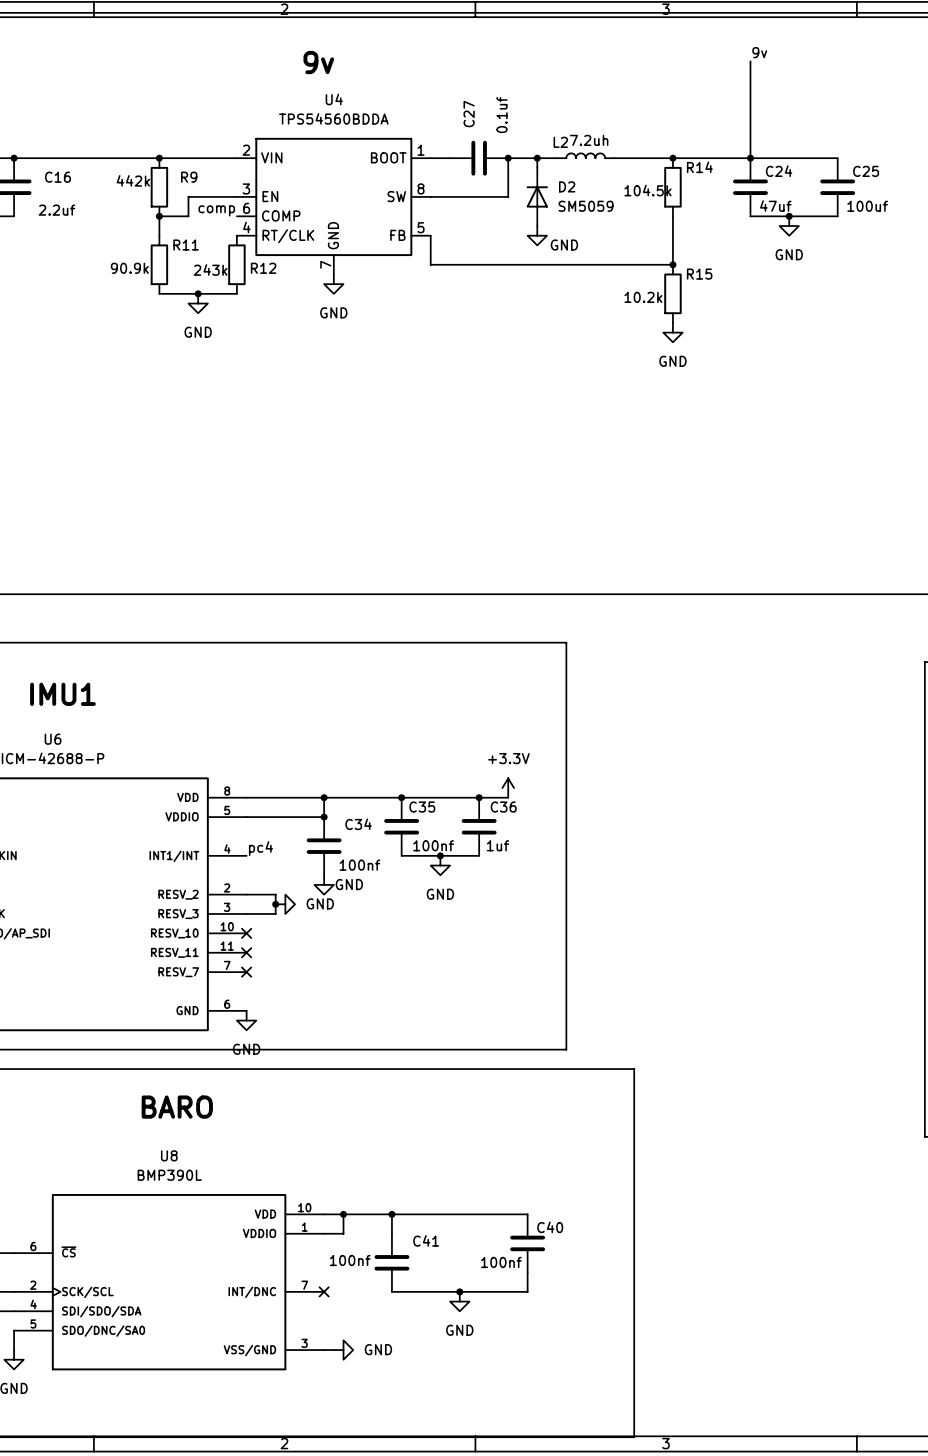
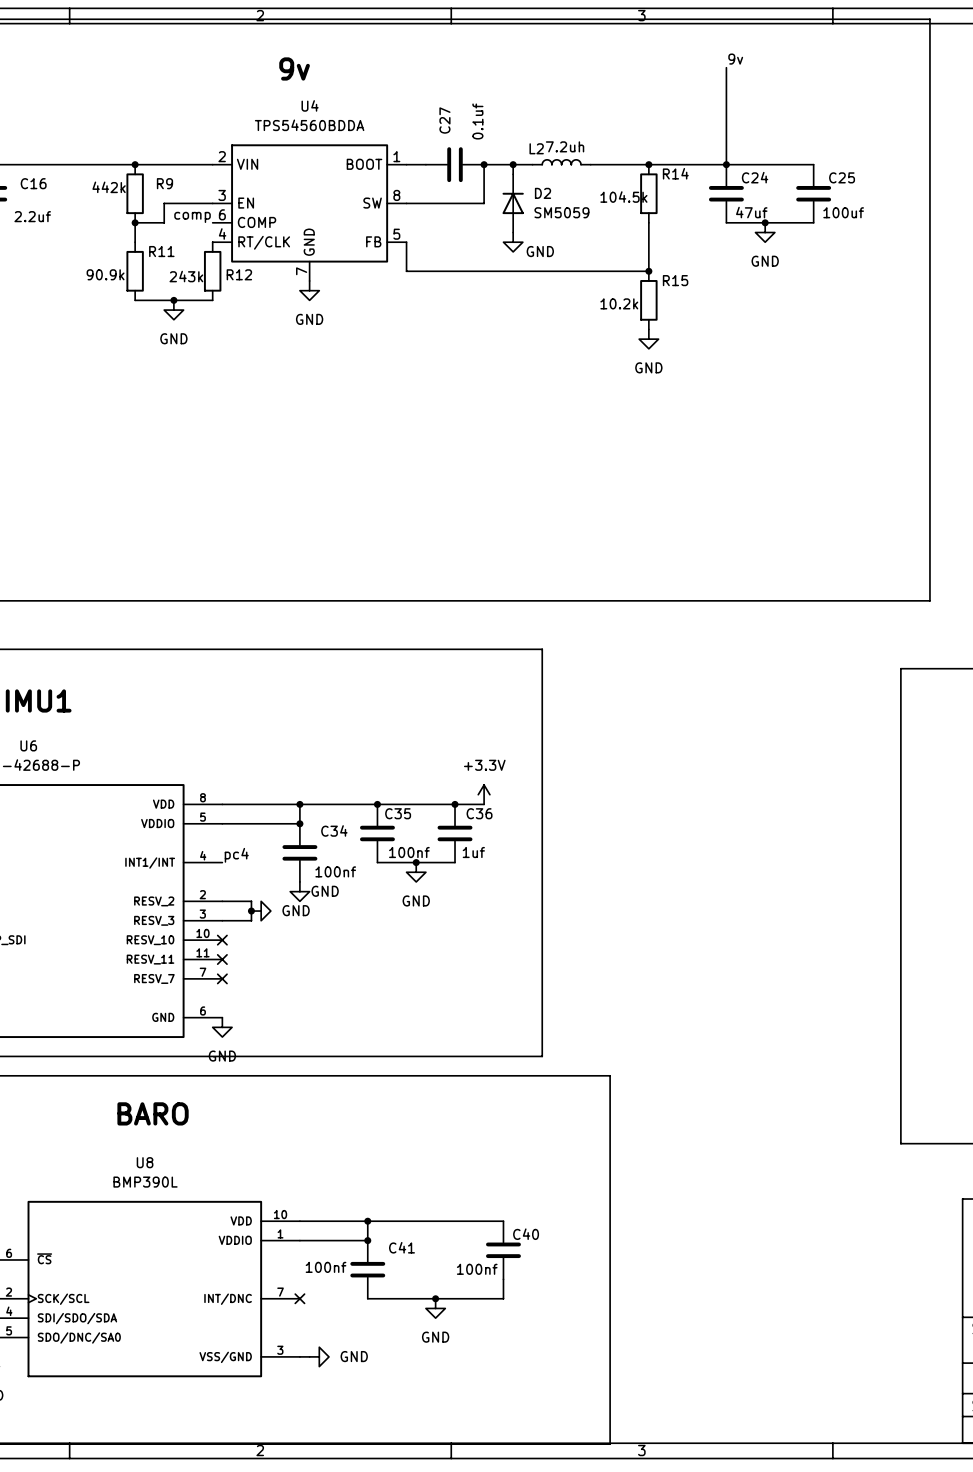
wire: (343, 1214) (343, 1233) -> (367, 1240) (319, 1240)
junction: (343, 1214) -> none
junction: none -> (367, 1240)

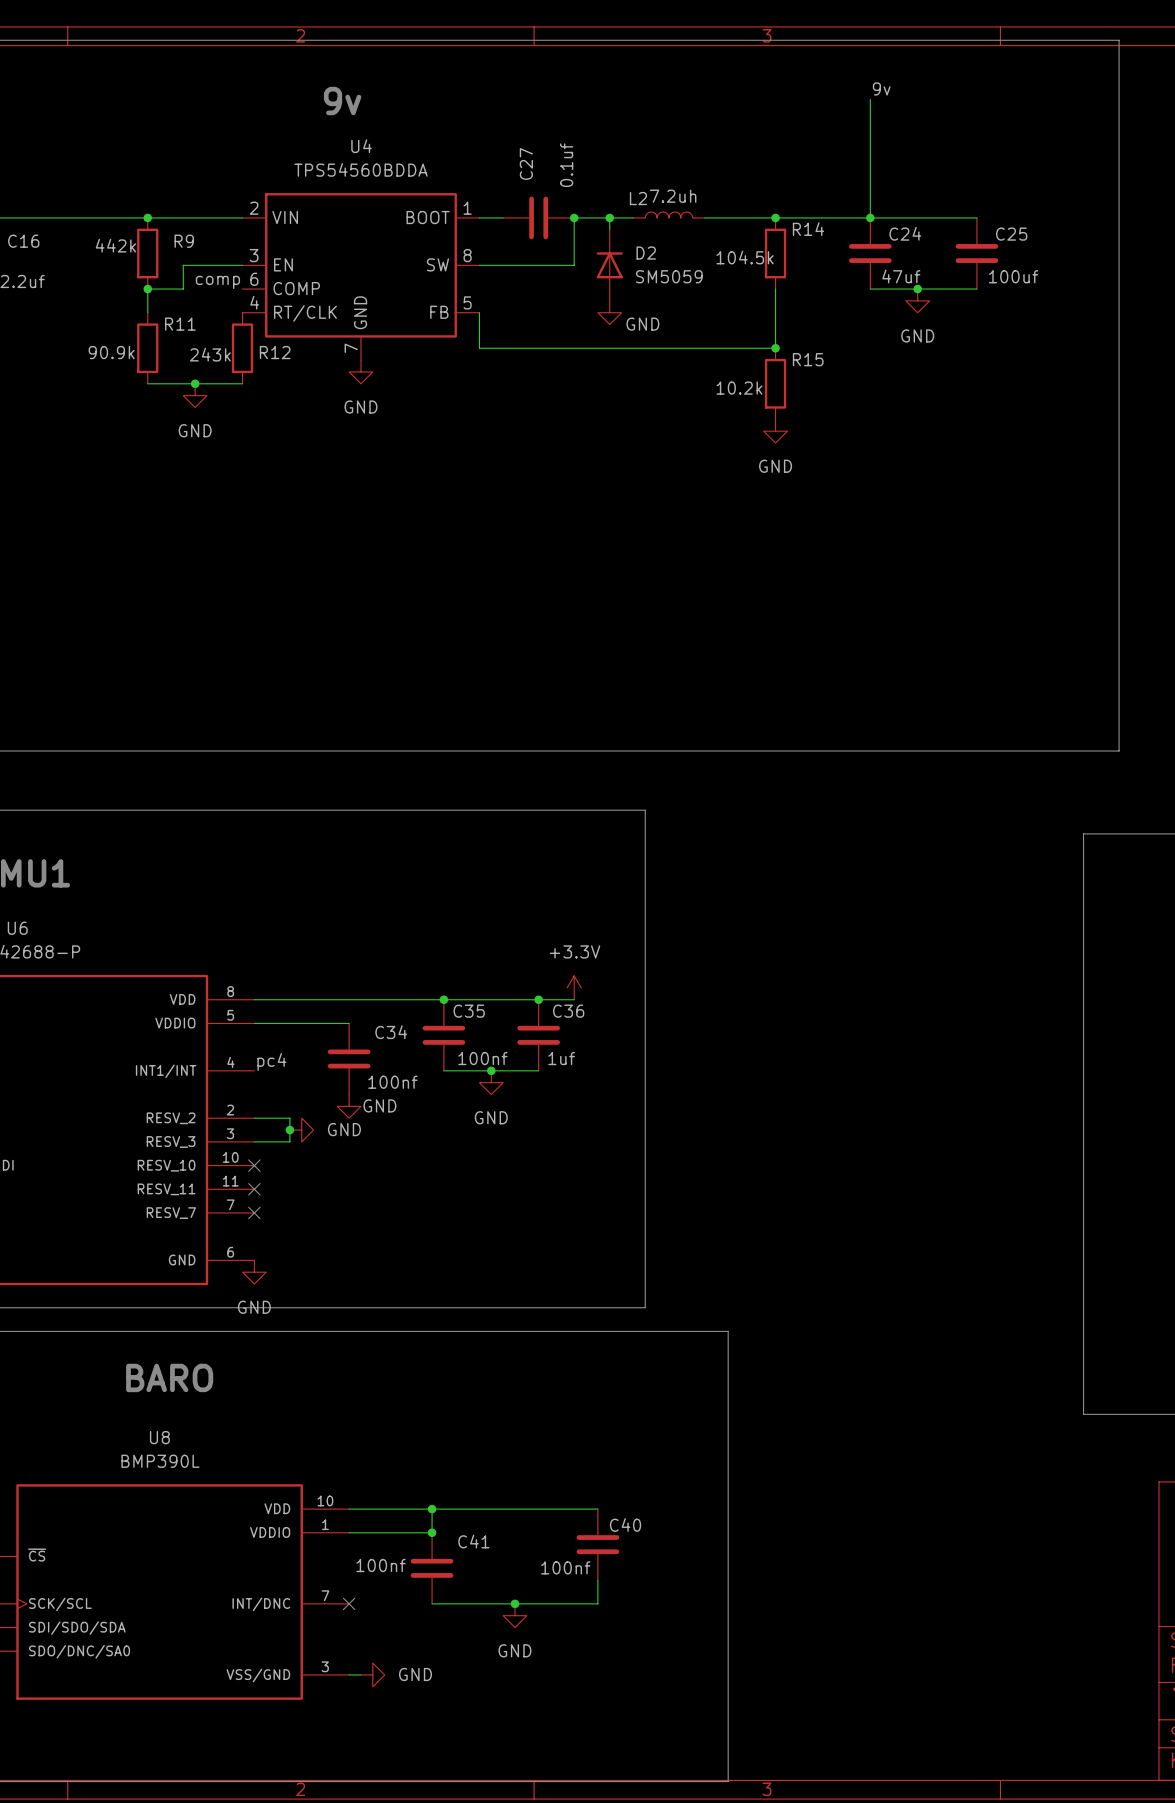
wire: (299, 804) (299, 823) -> none
junction: (299, 804) -> none
junction: (299, 823) -> none

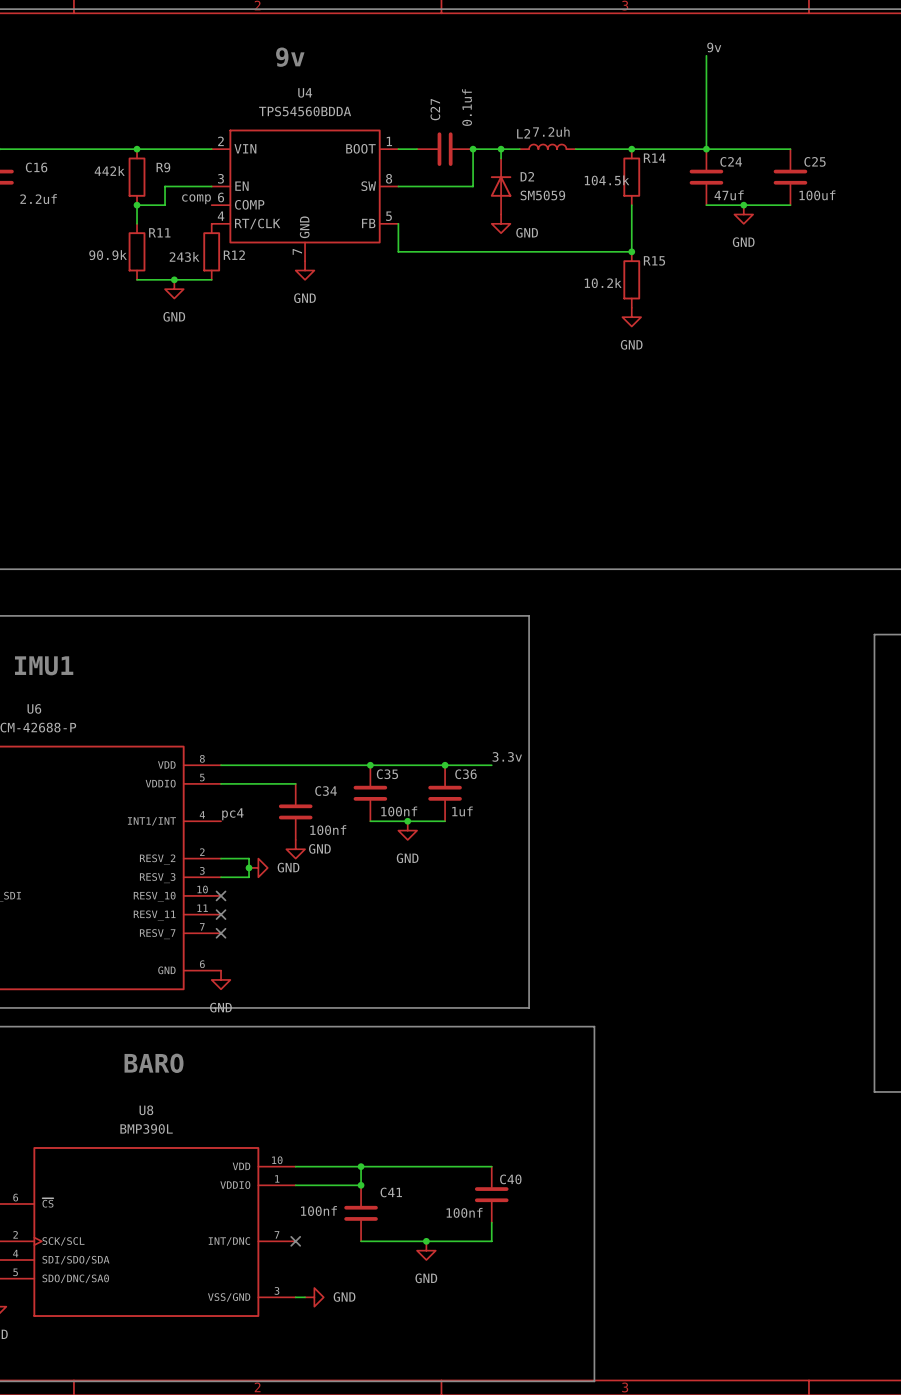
power symbol: +3.3V (574, 987) -> none
label: none -> 3.3v (507, 756)
wire: none -> (473, 765) (491, 765)

